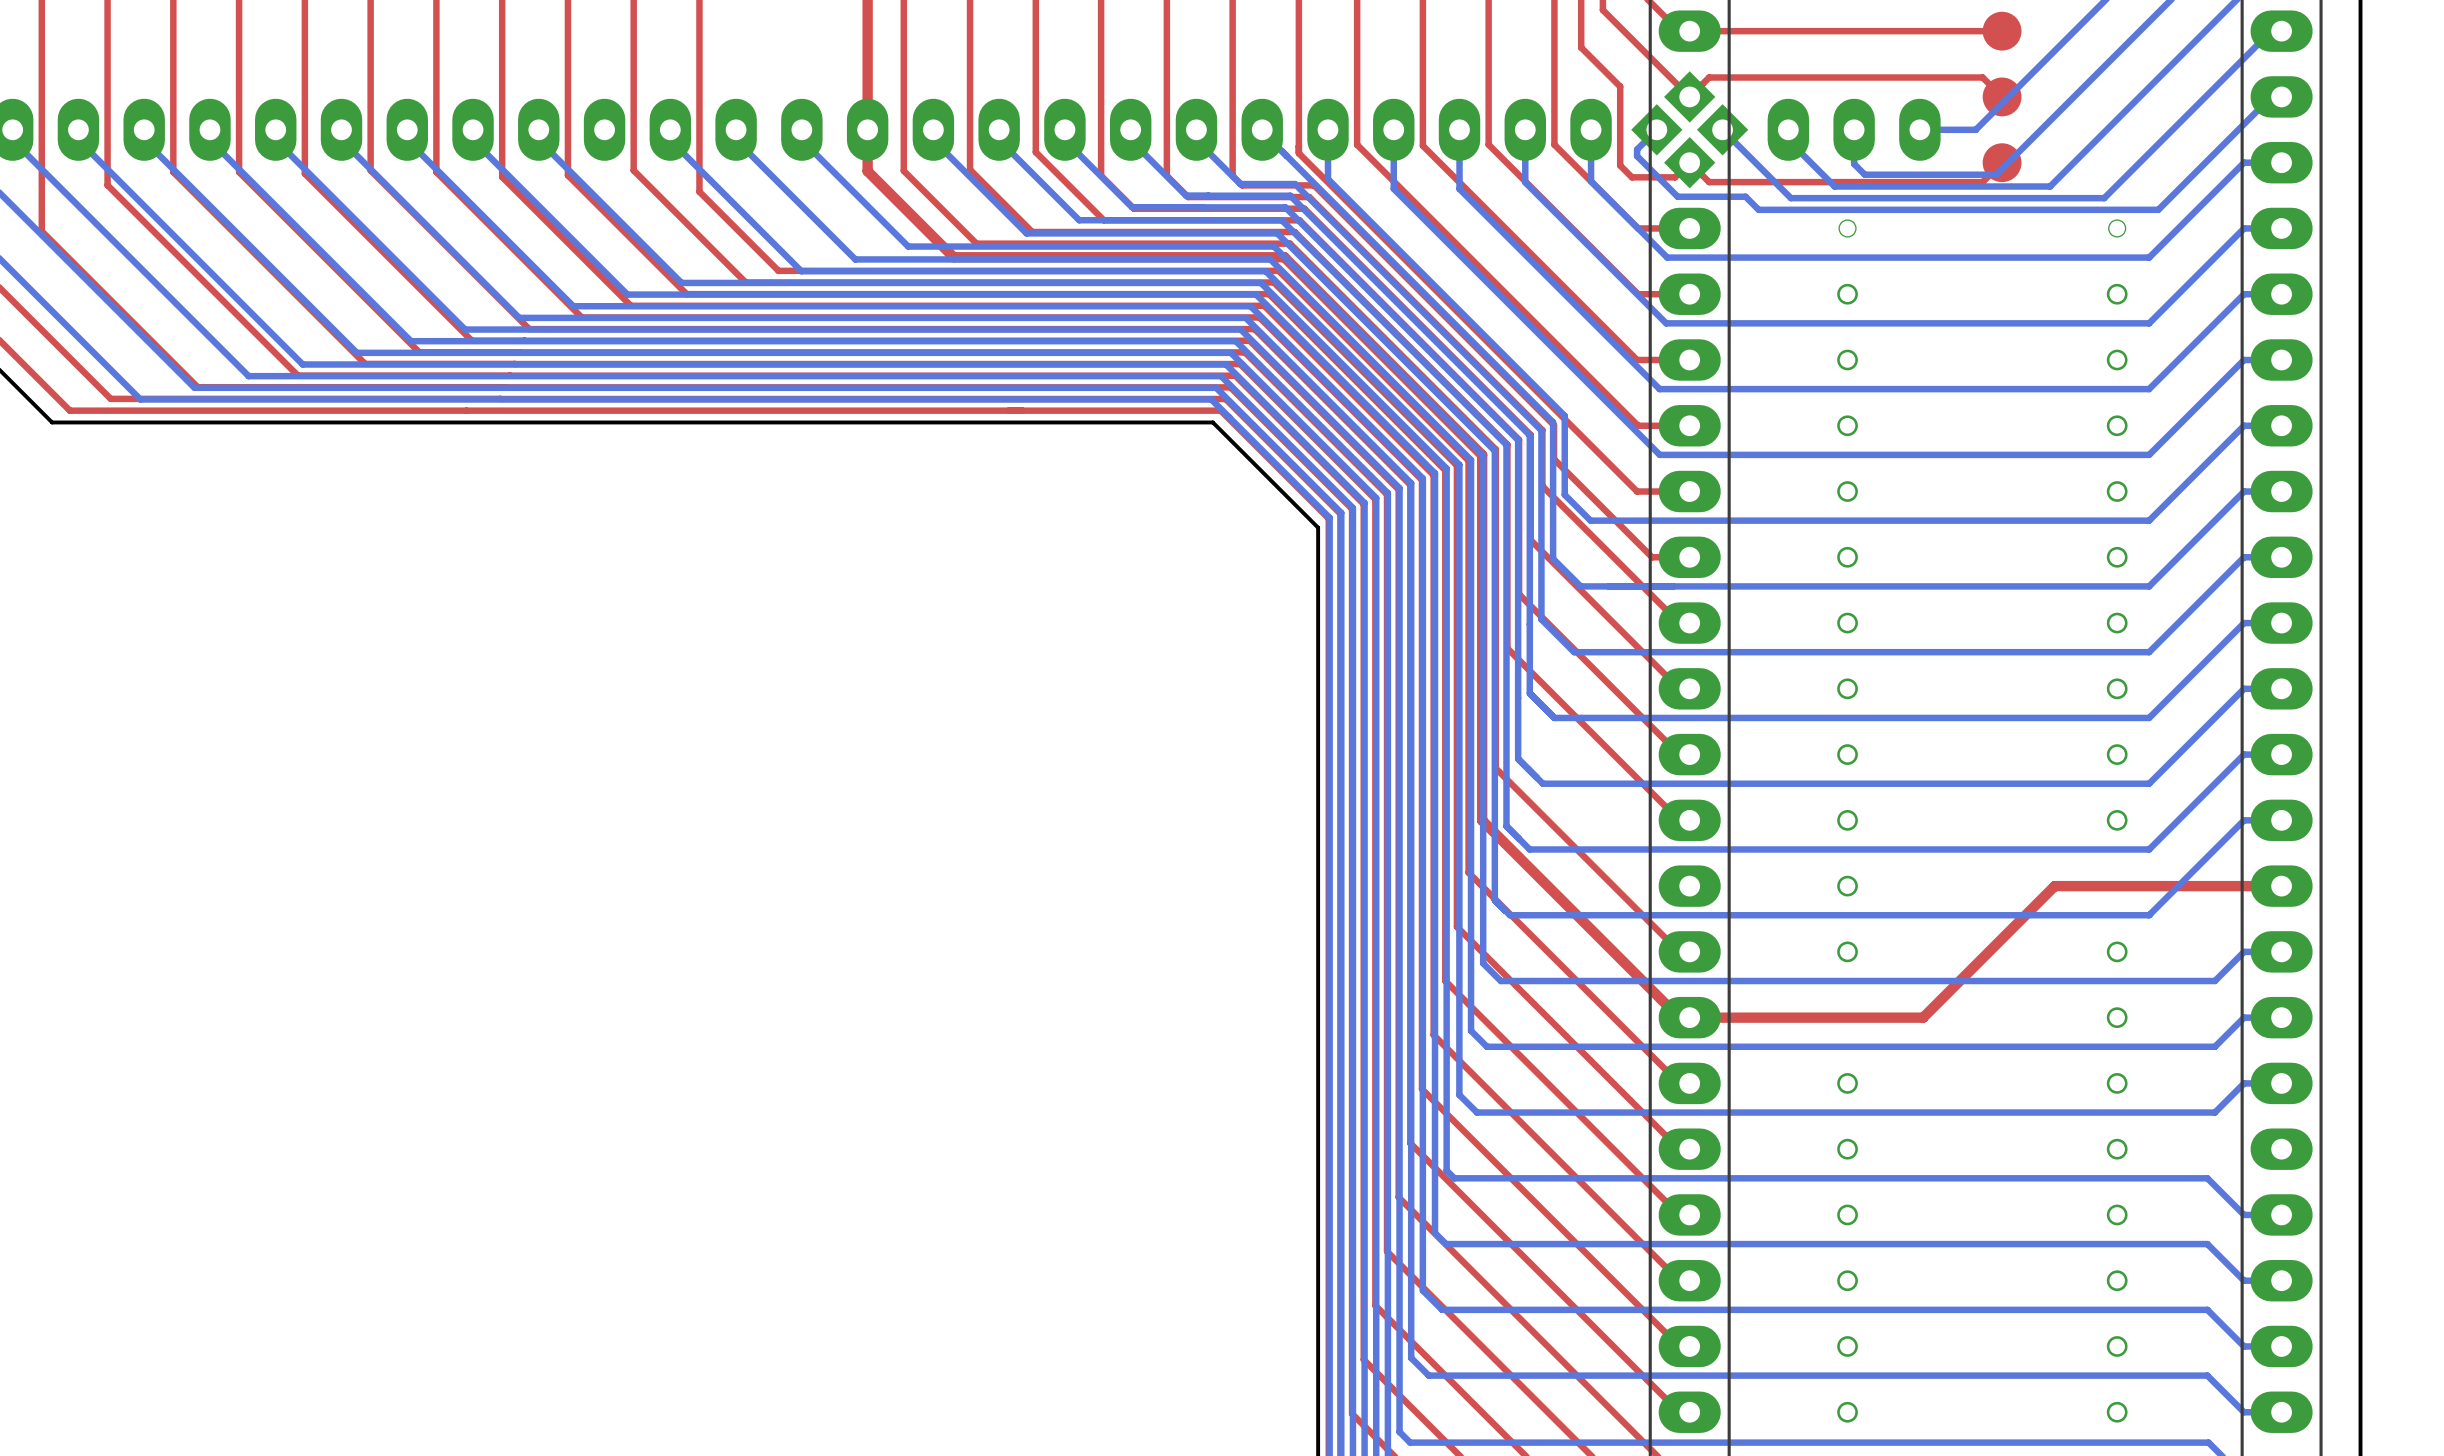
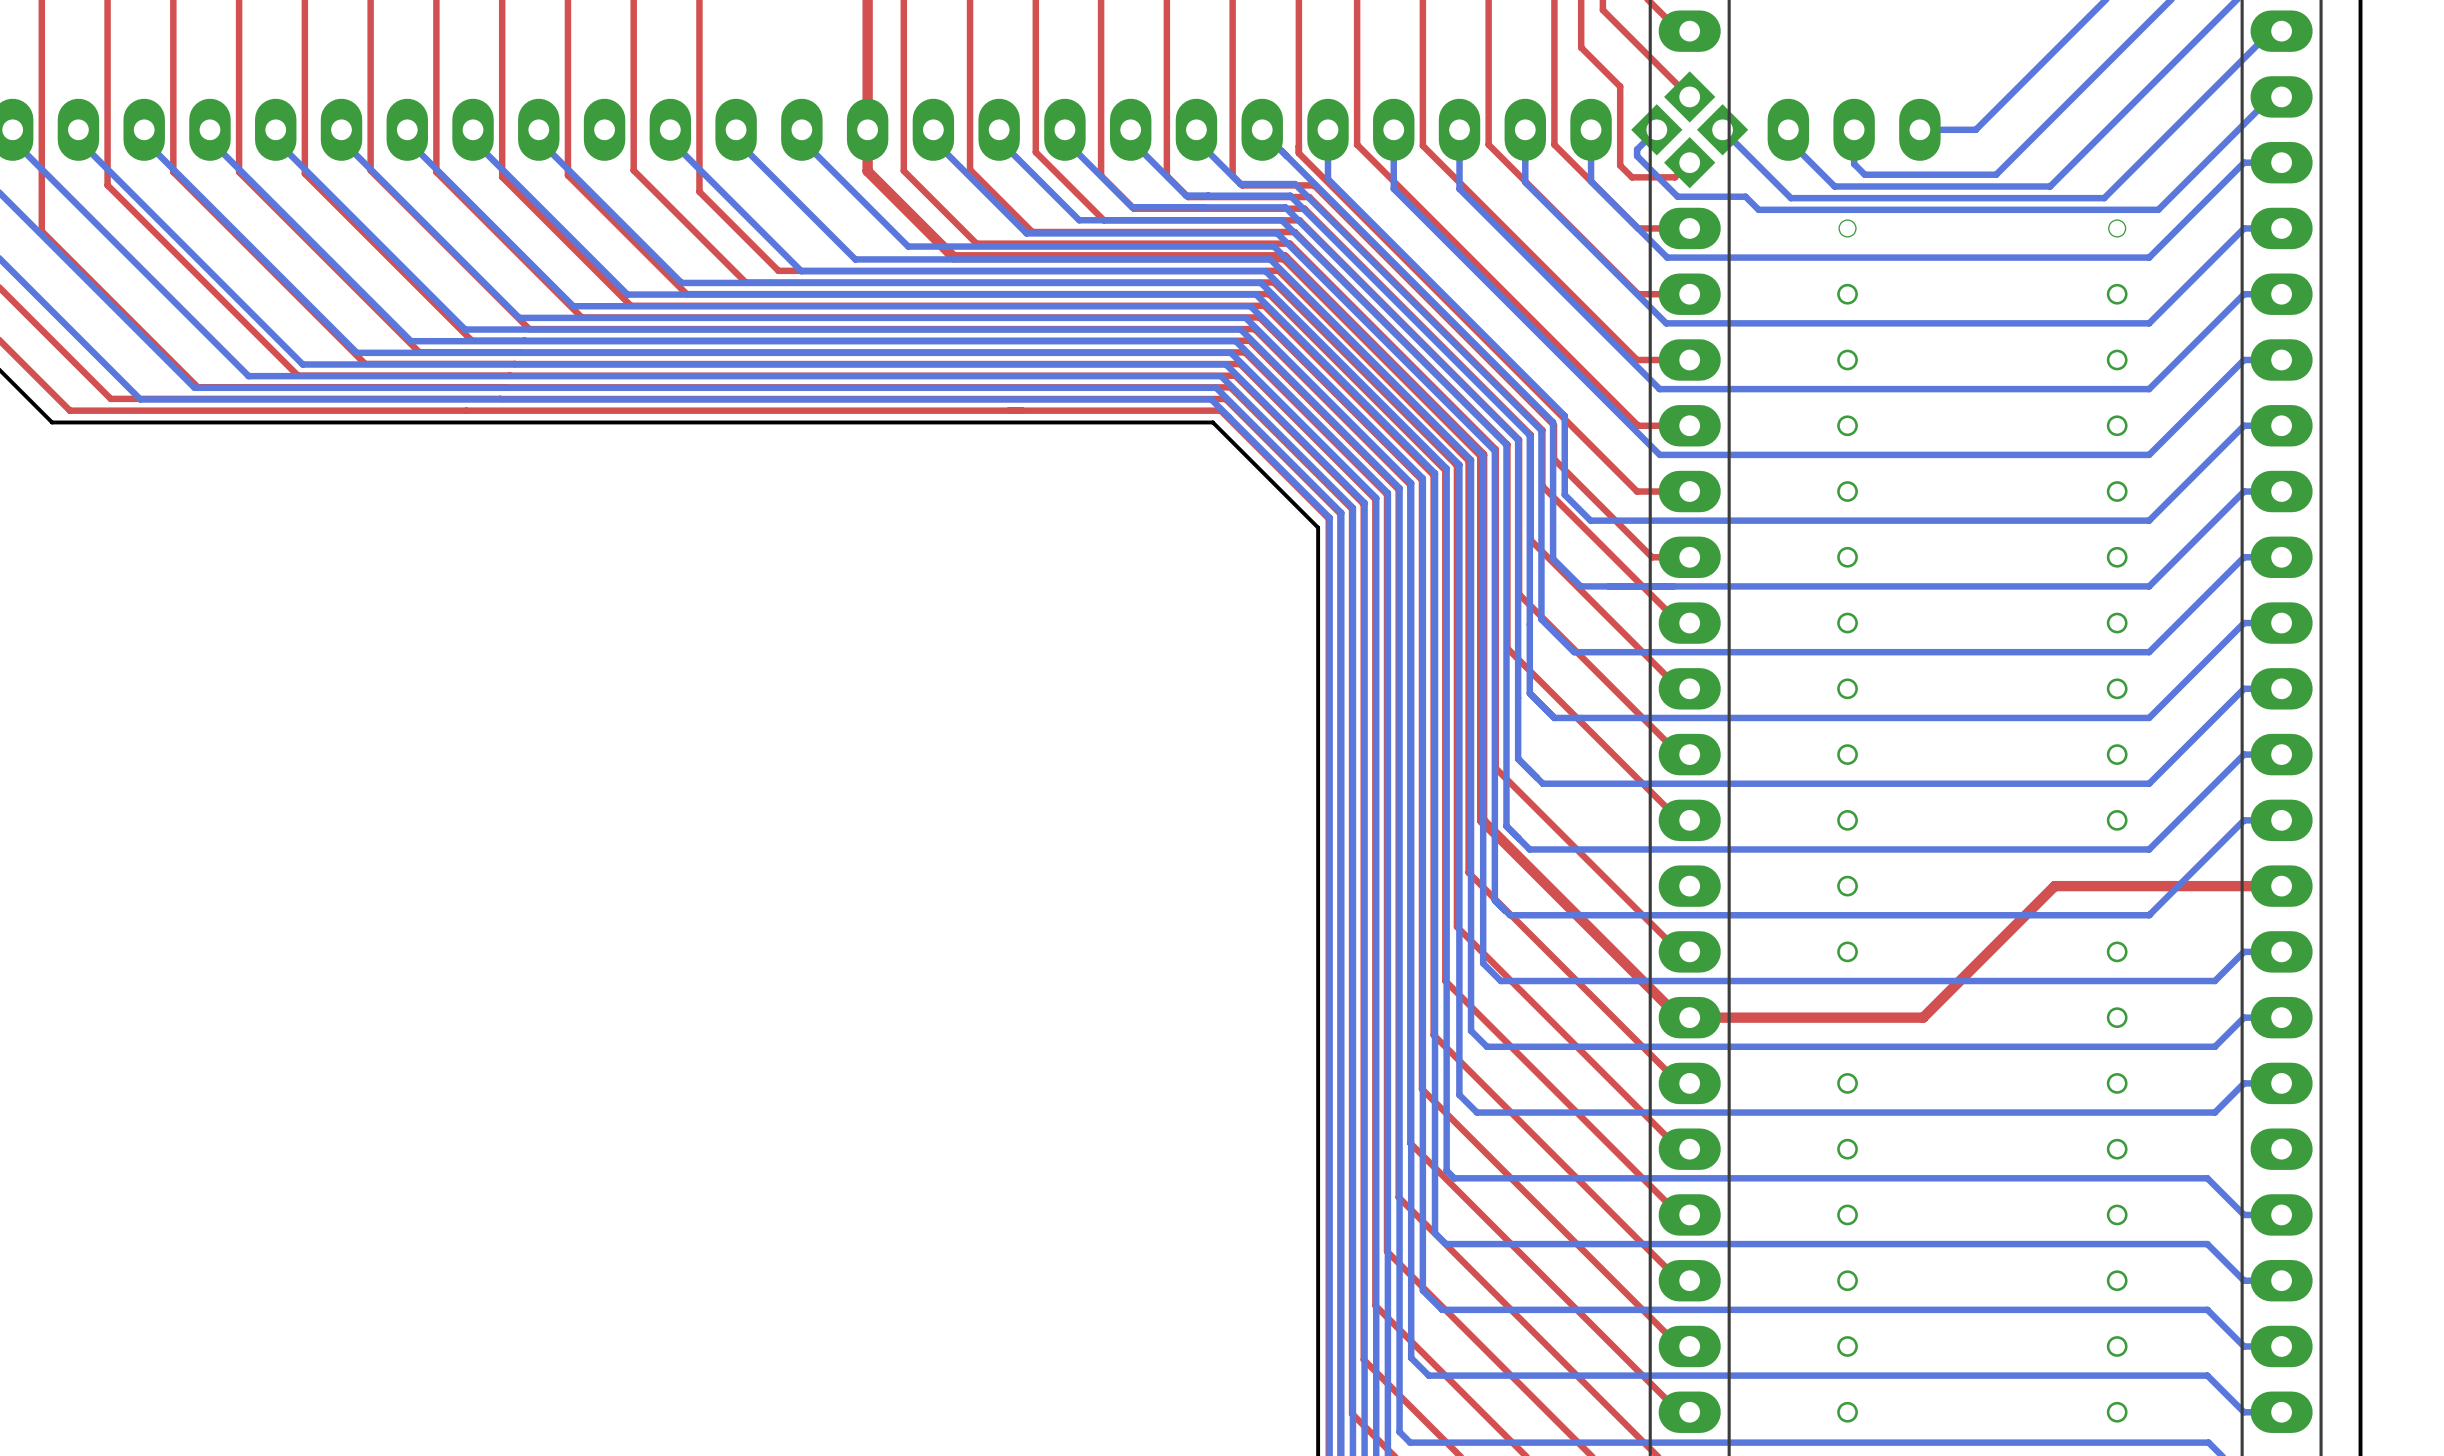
top track: (2002, 31) (1689, 31) -> none
part: (2002, 31) -> none
top track: (2002, 96) (1982, 77) (1709, 77) (1689, 96) -> none
part: (2002, 96) -> none
top track: (2002, 162) (1982, 182) (1709, 182) (1689, 162) -> none
part: (2002, 162) -> none

